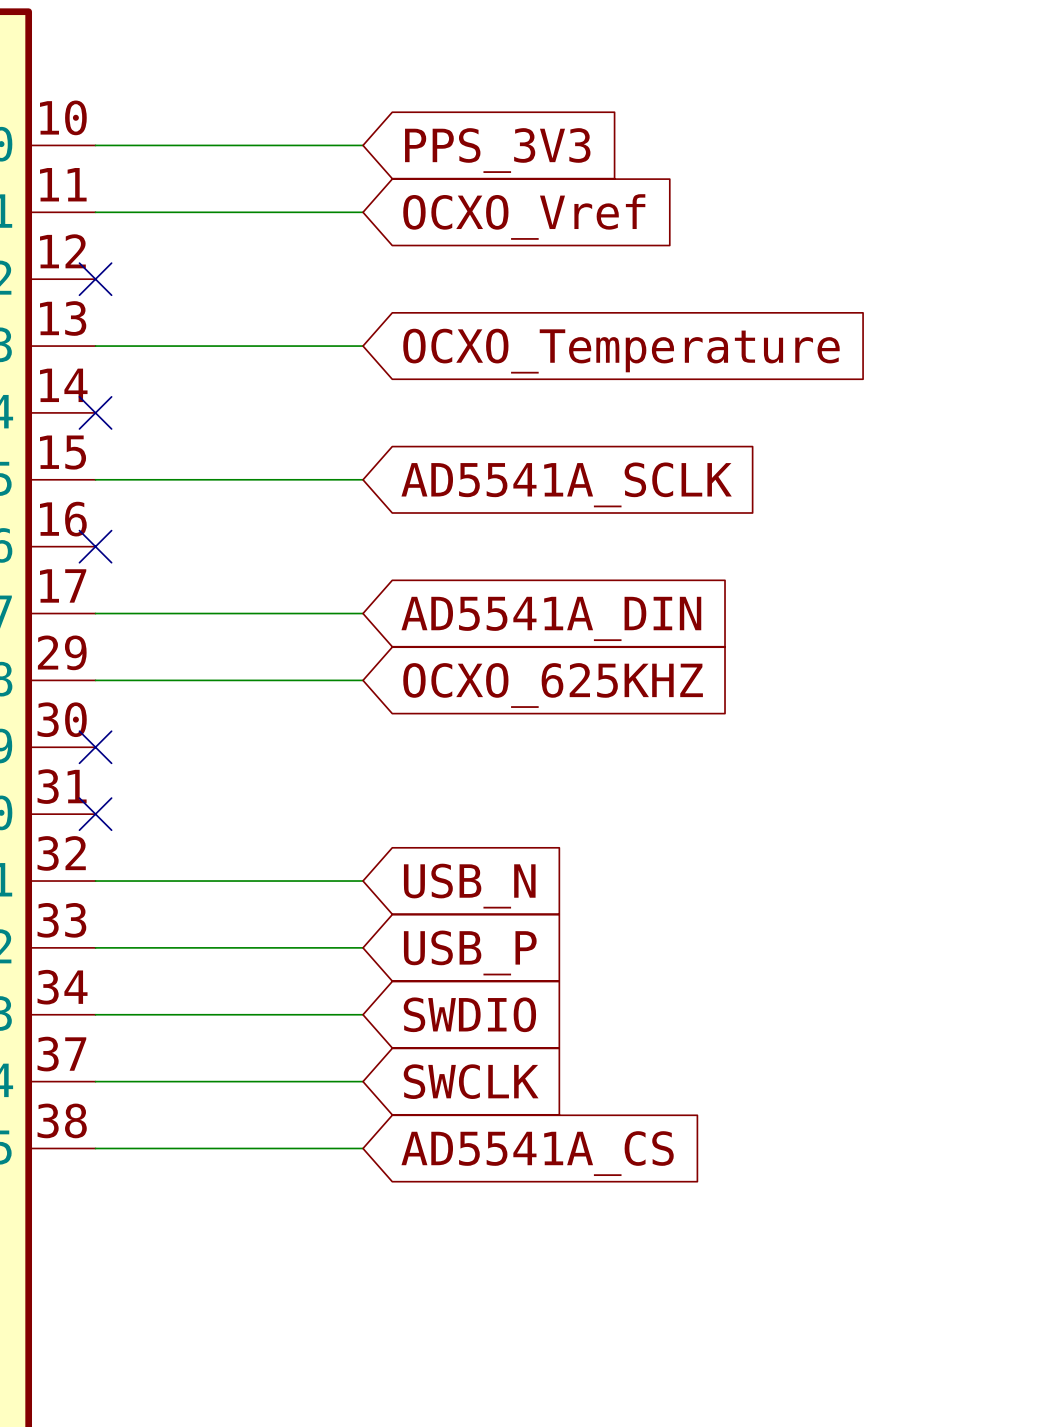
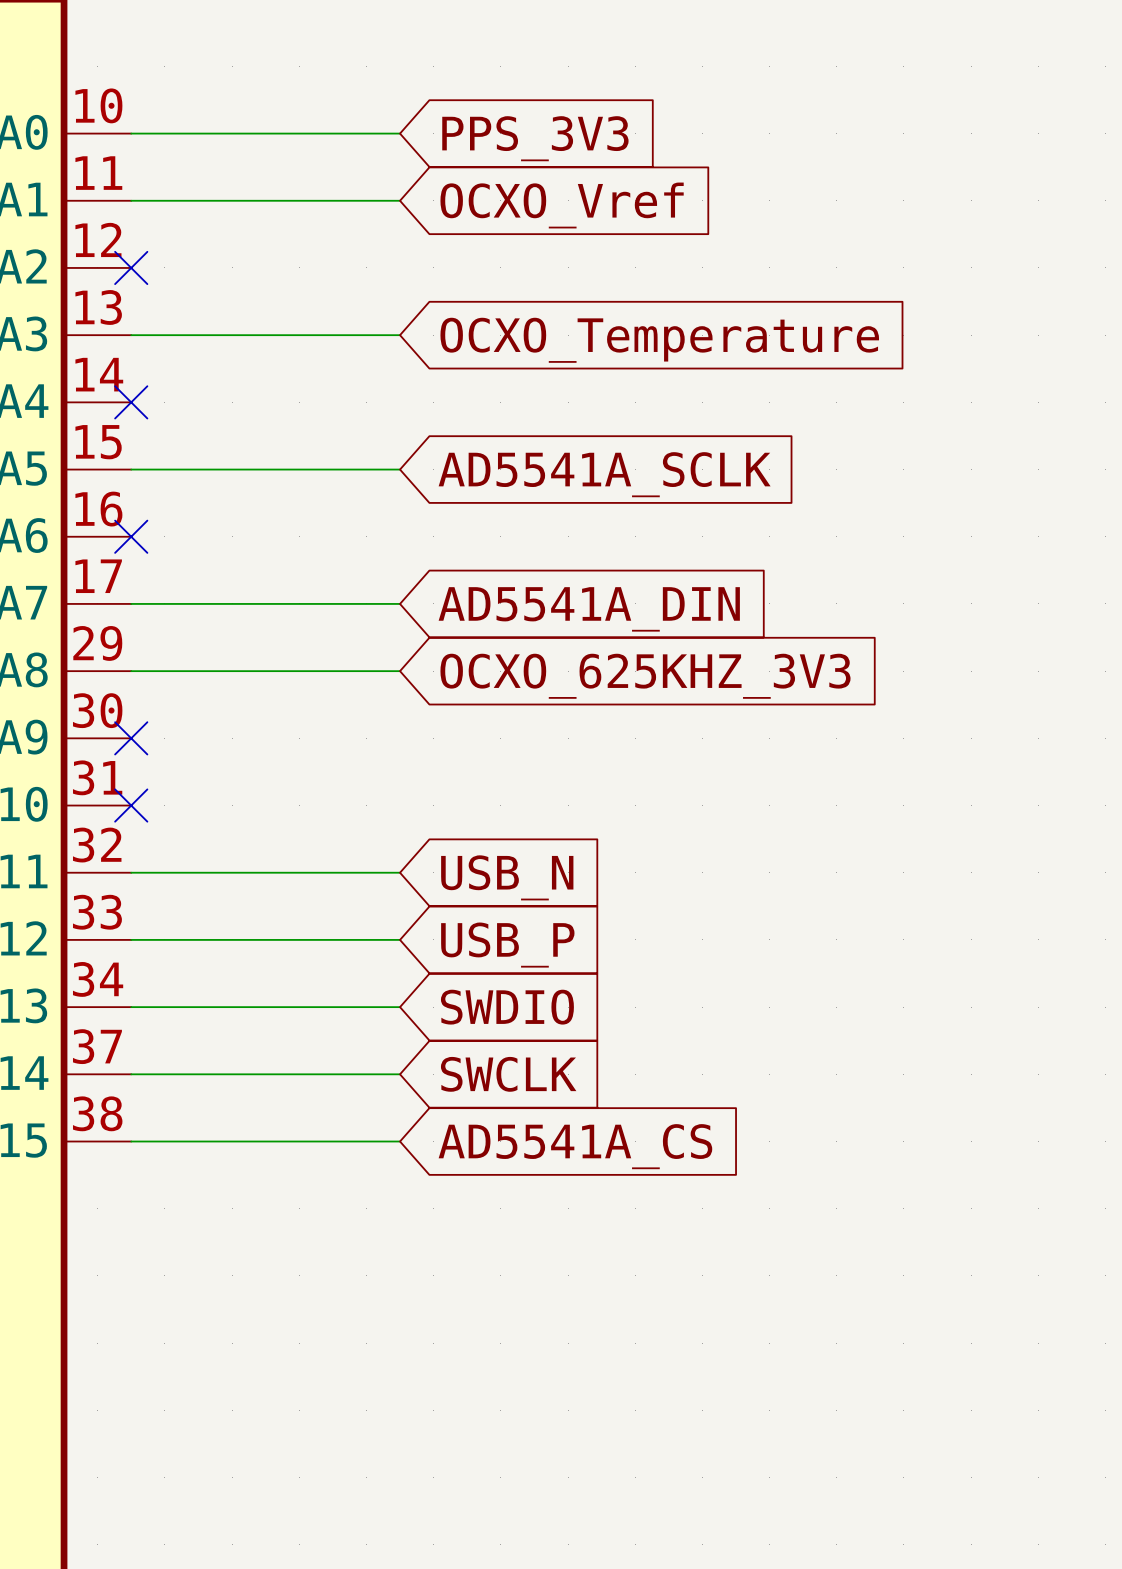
global label: OCXO_625KHZ (553, 685) -> OCXO_625KHZ_3V3 (645, 676)

